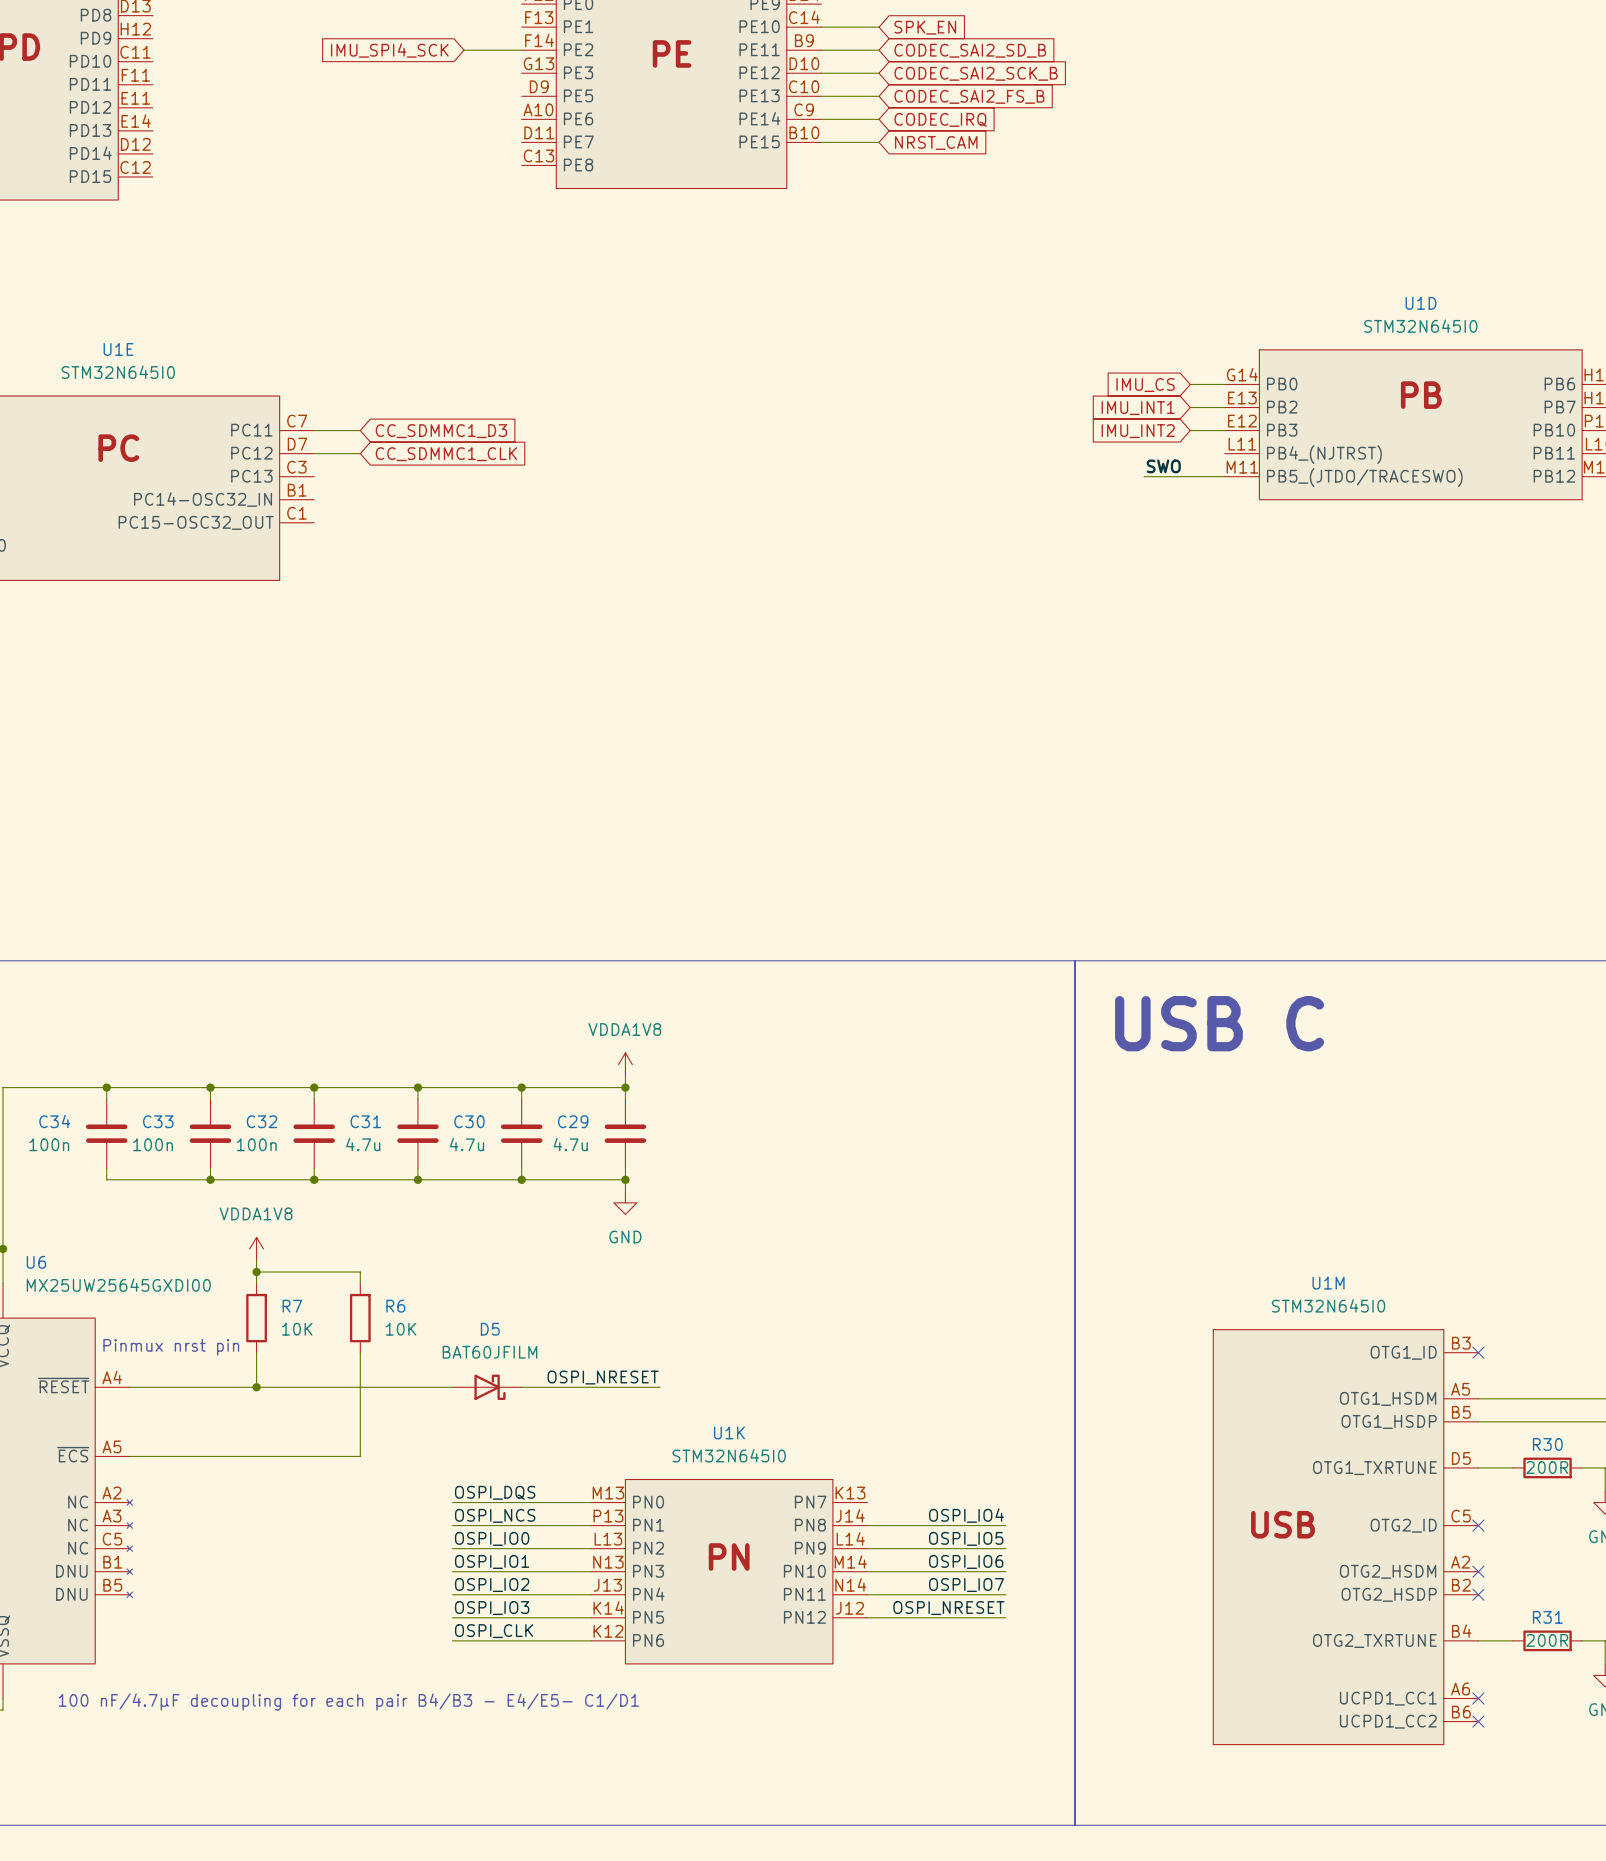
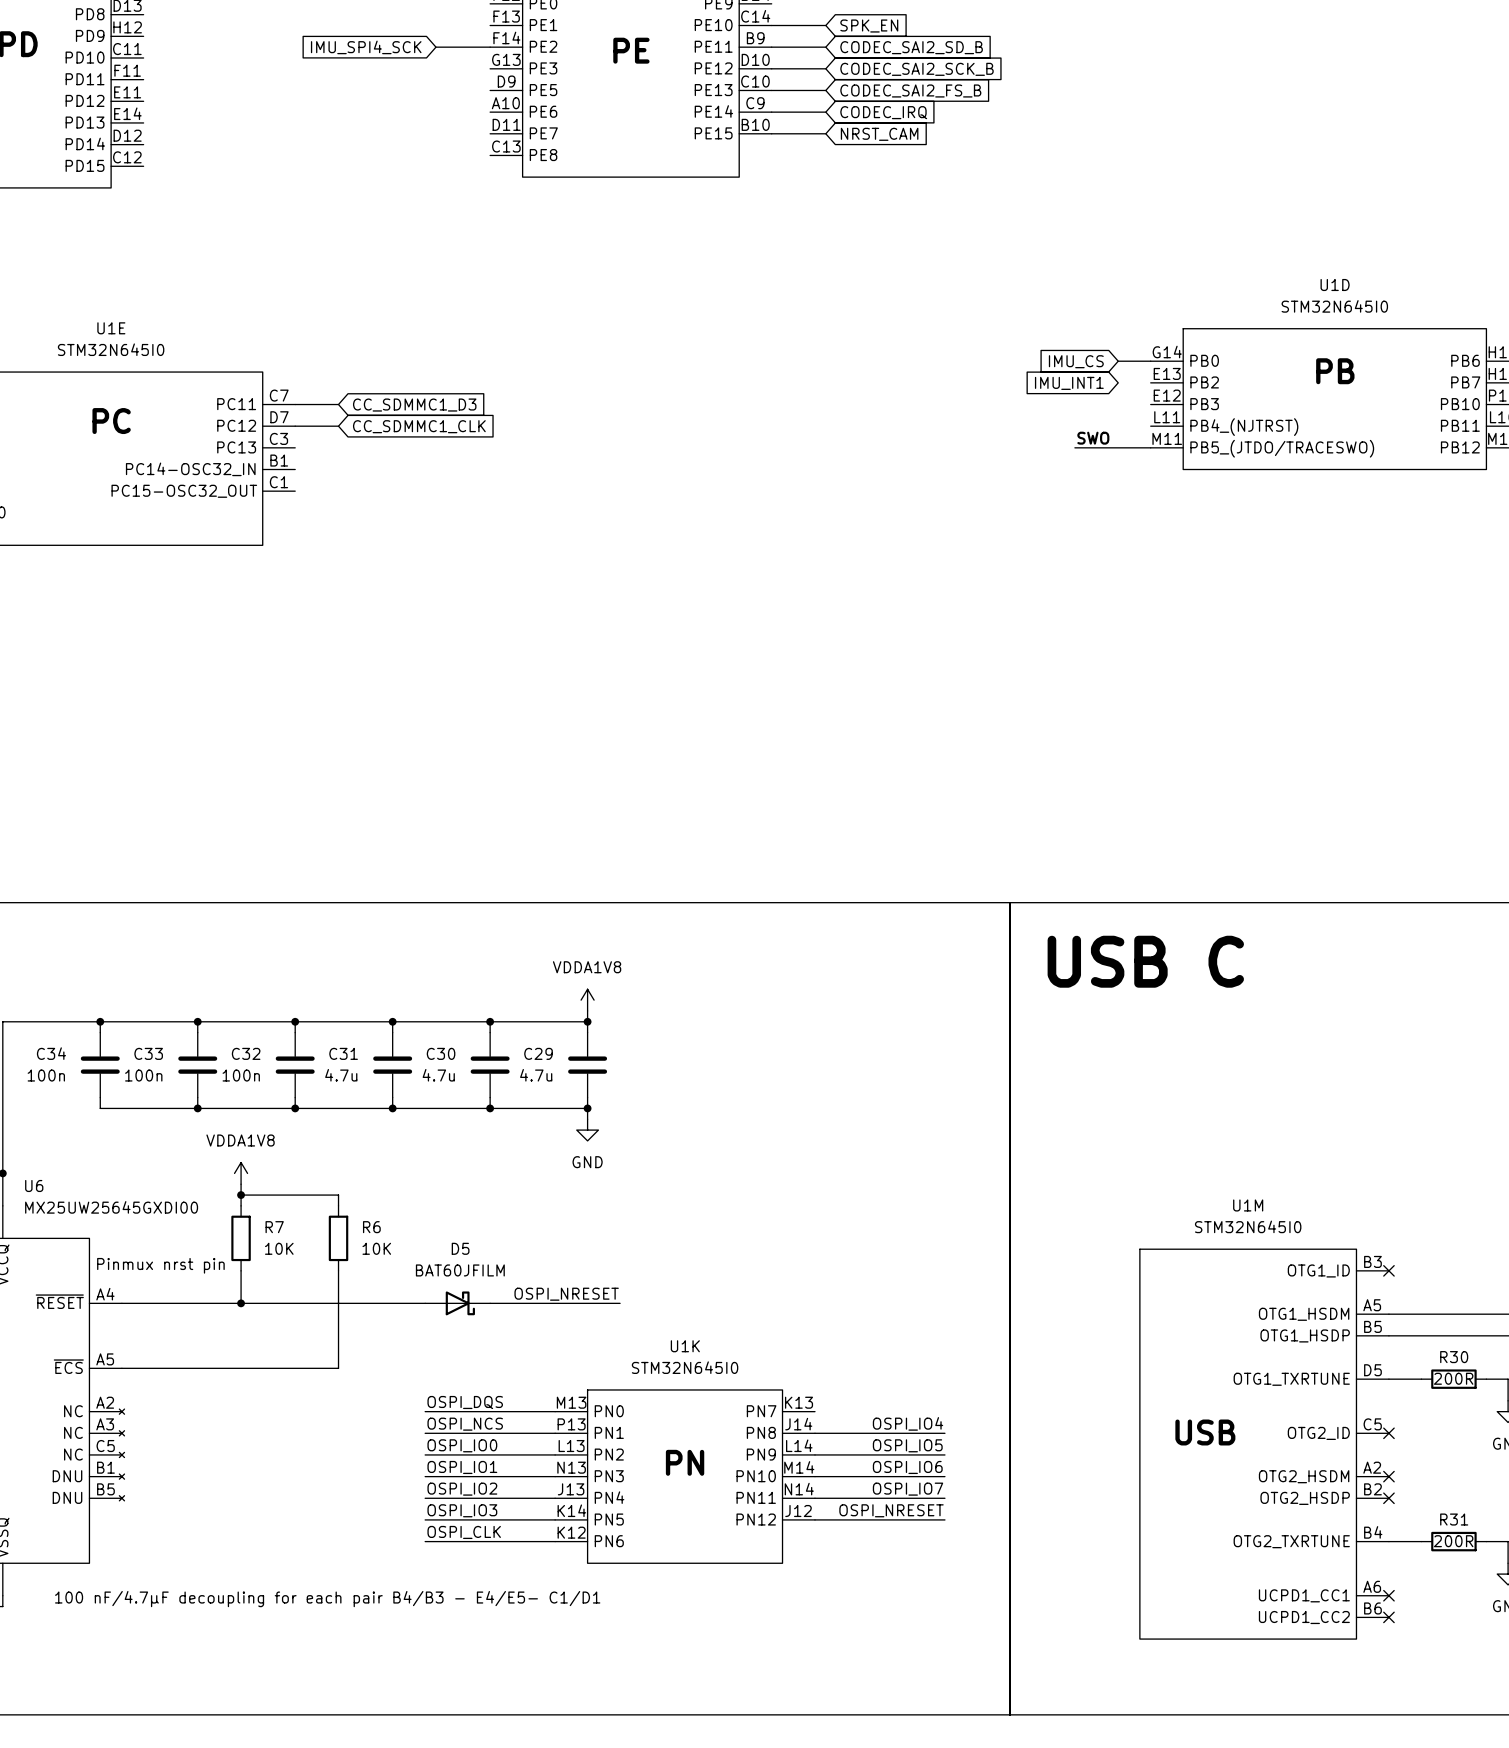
wire: (1190, 407) (1224, 407) -> none
wire: (1190, 430) (1224, 430) -> none
global label: IMU_INT2 (1138, 431) -> none

